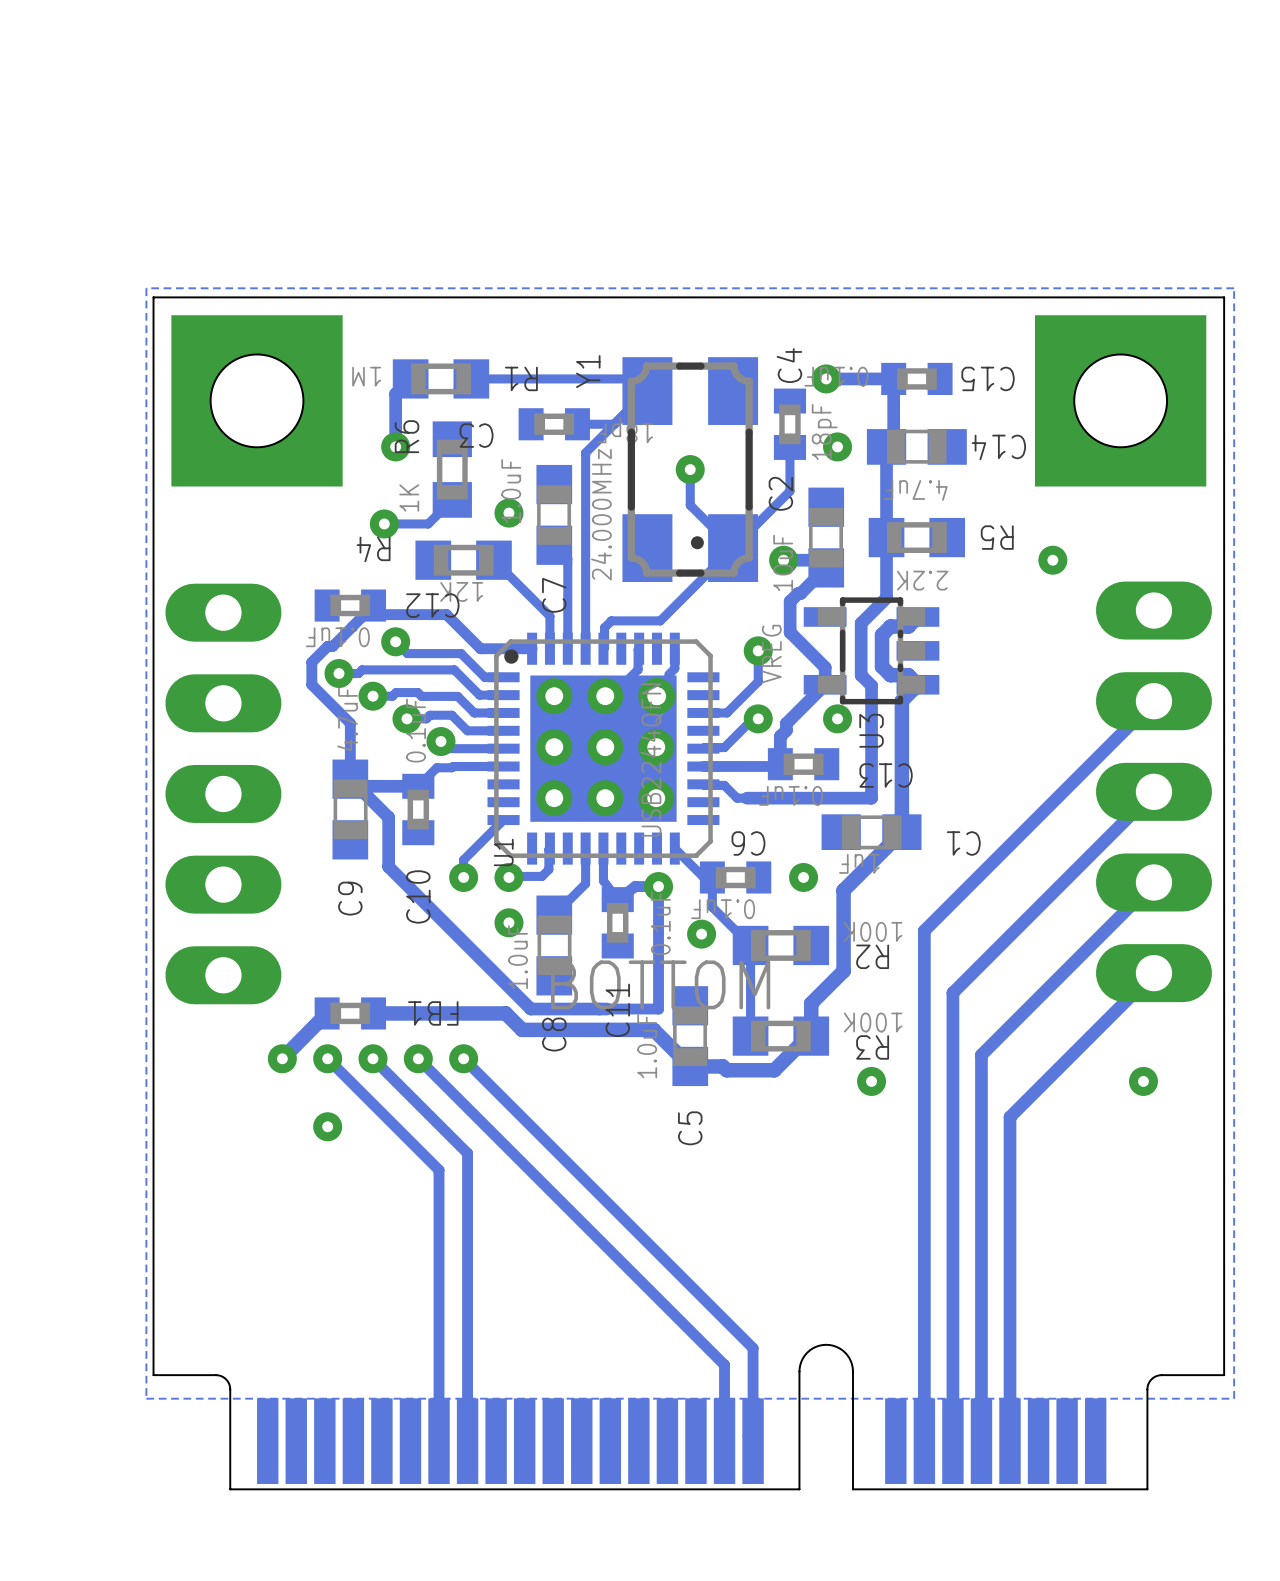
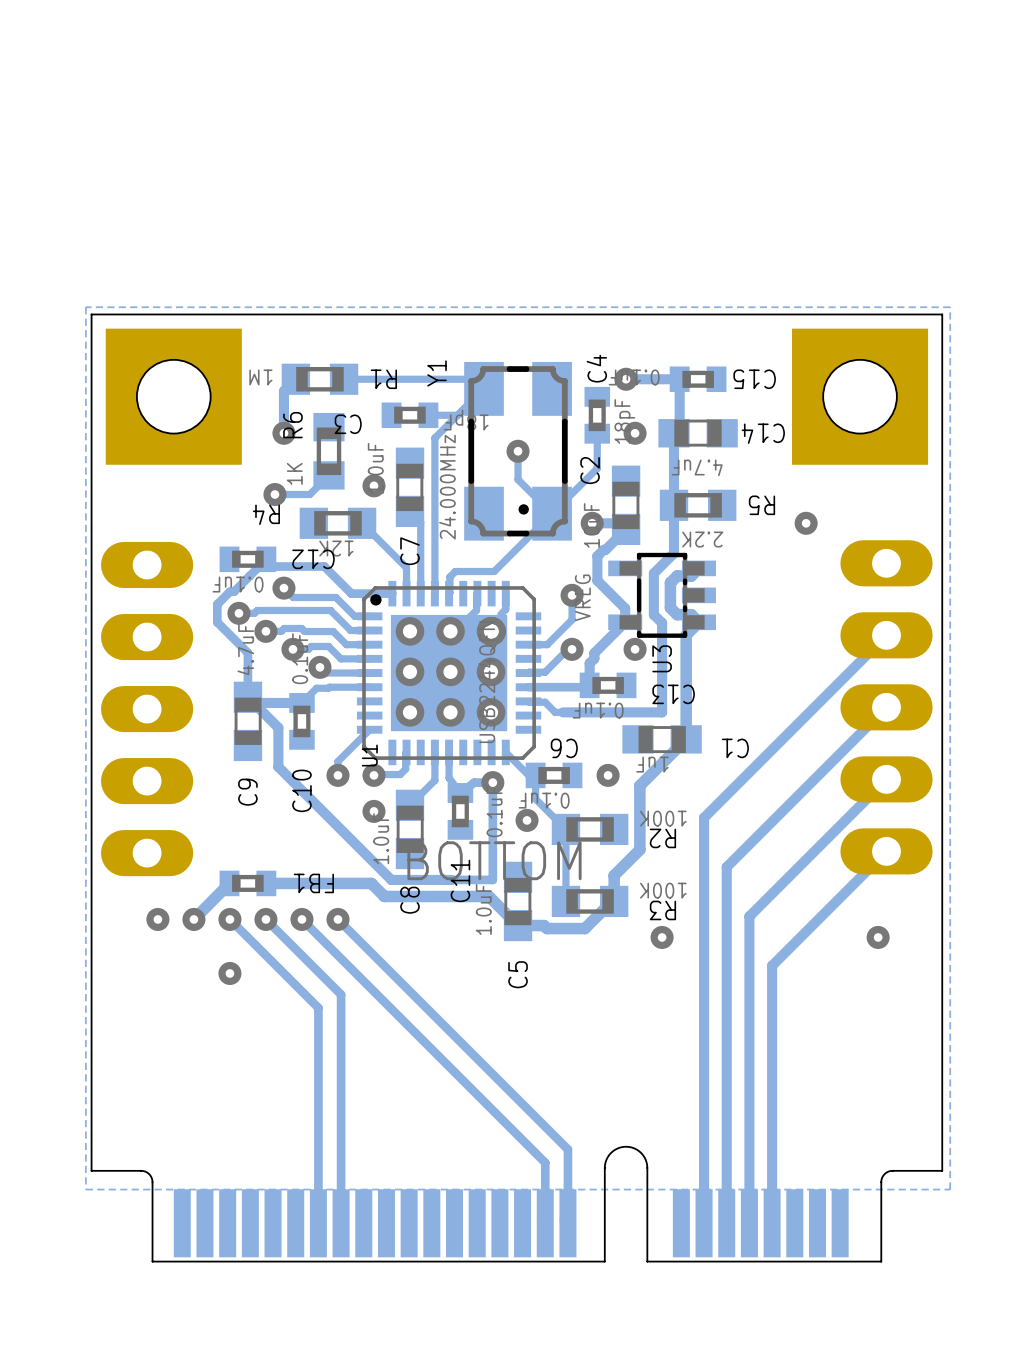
via: none -> (157, 919)

